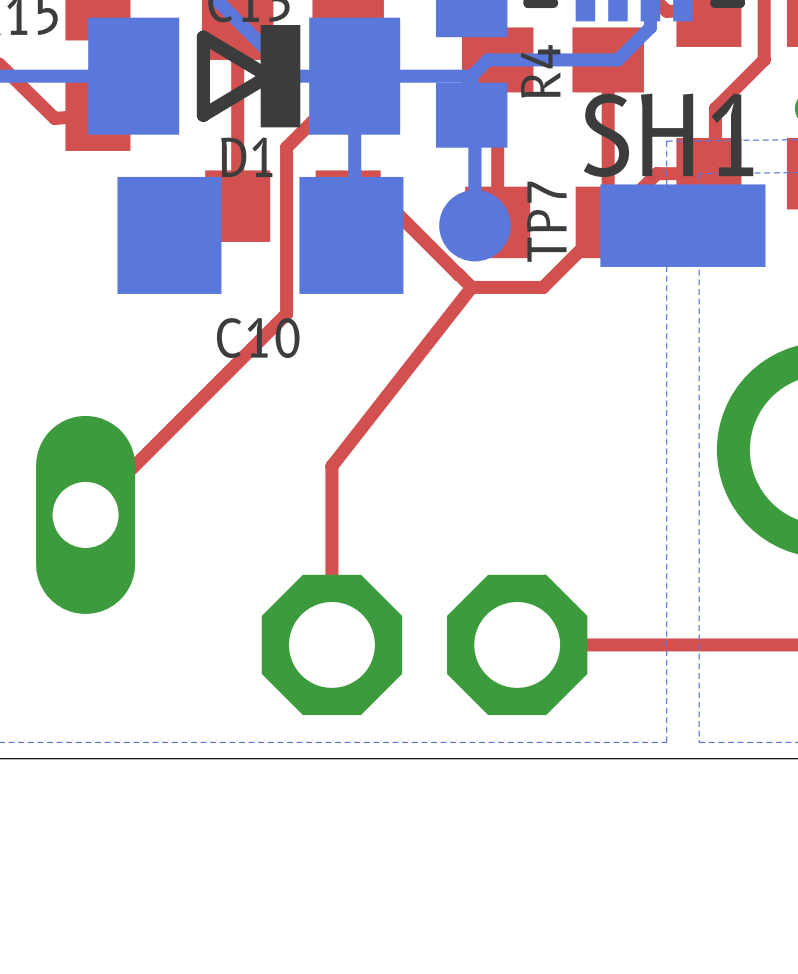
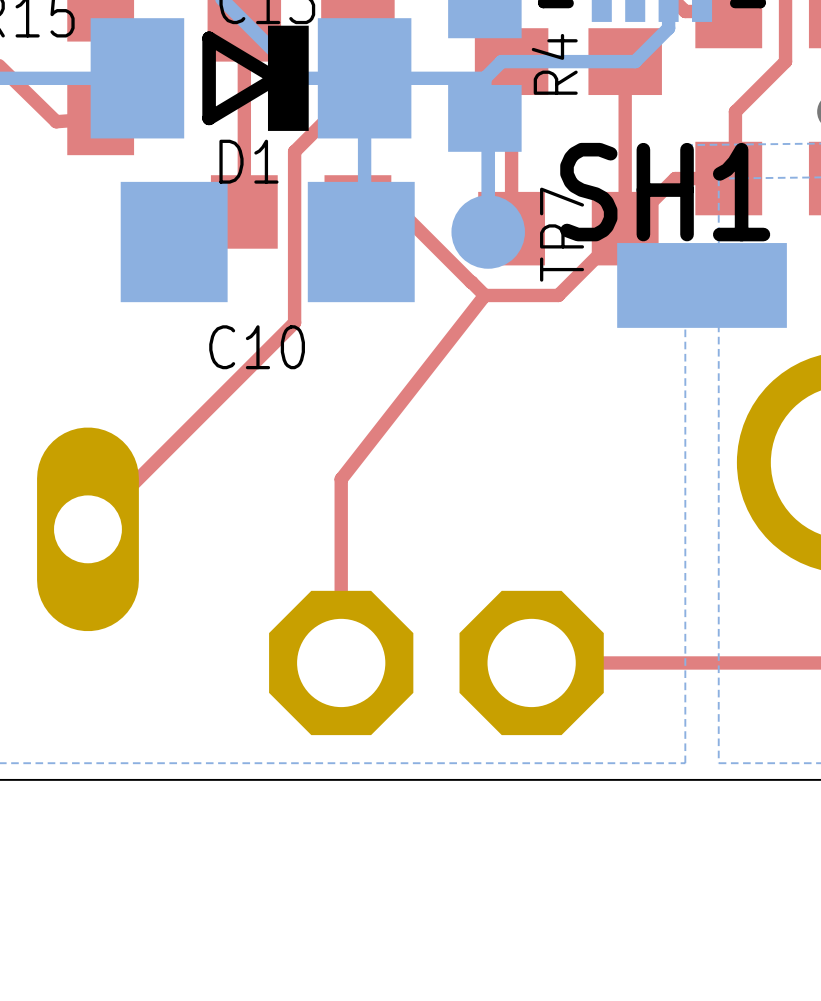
SH1 position: (682, 225) -> (702, 285)

